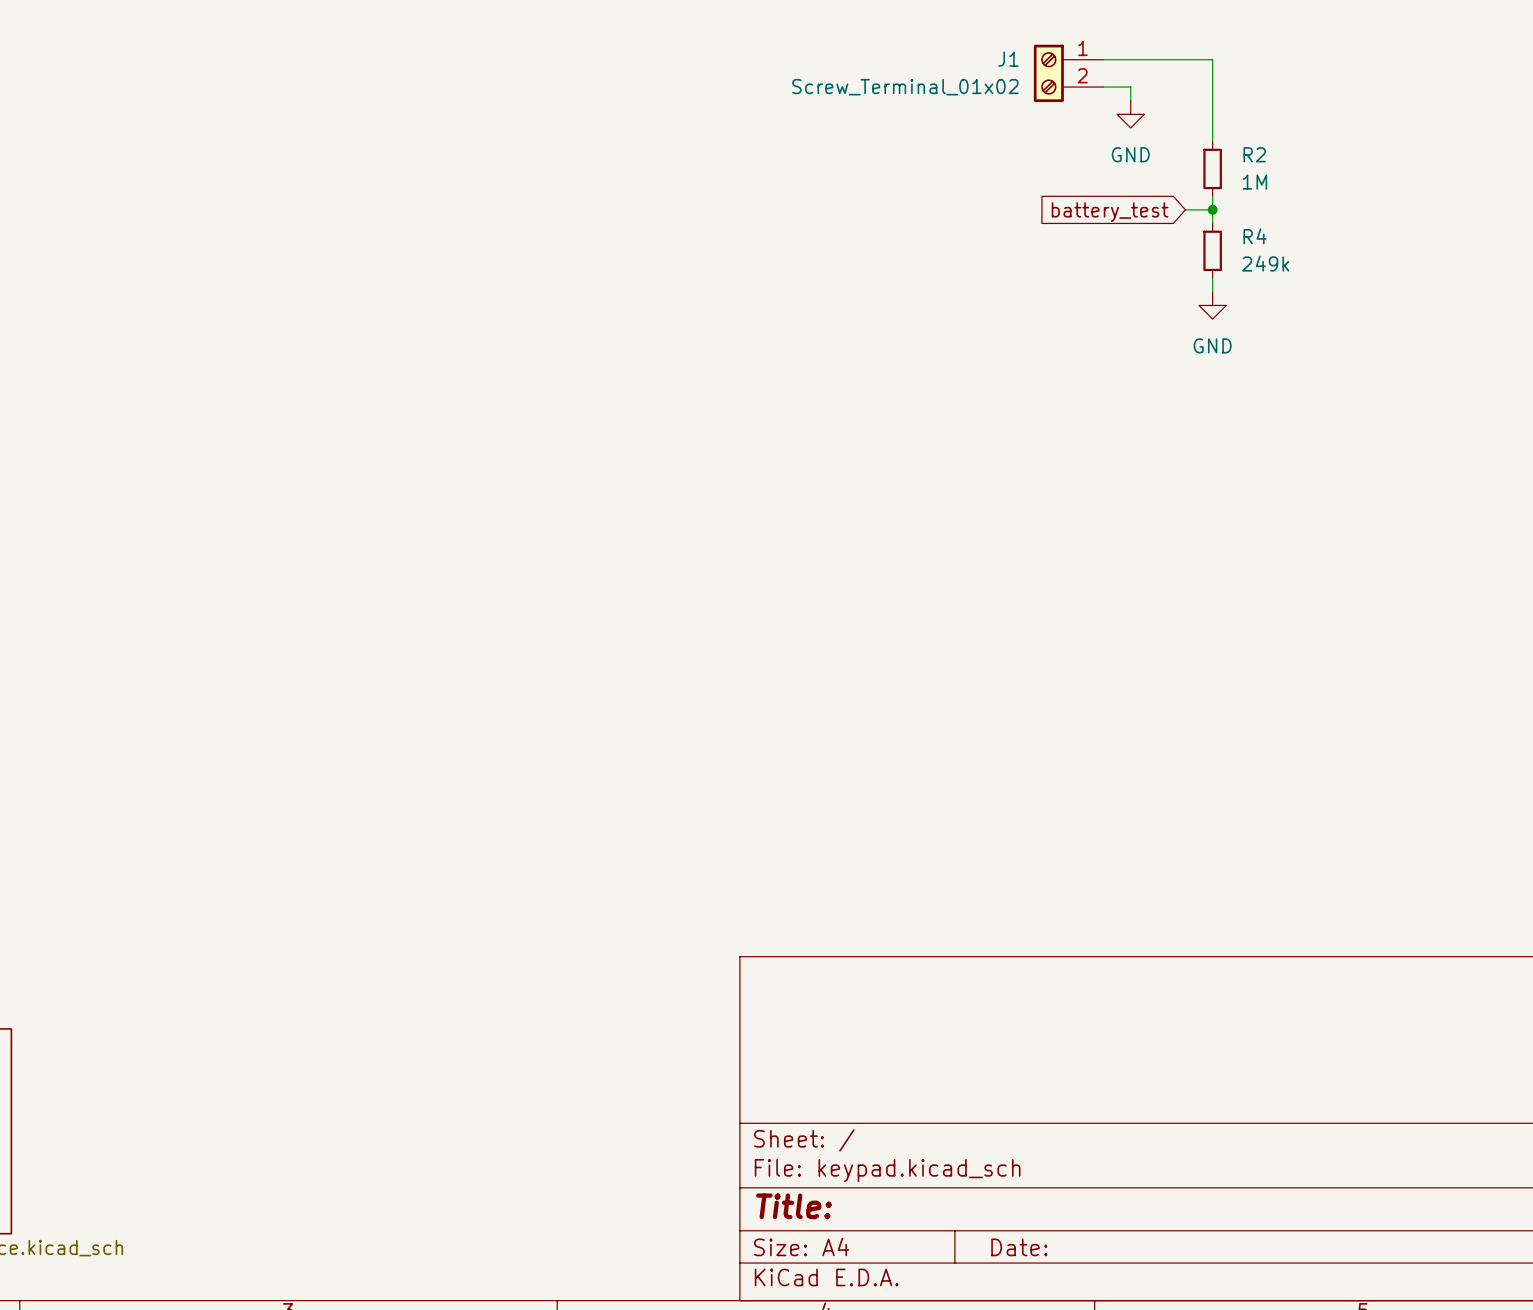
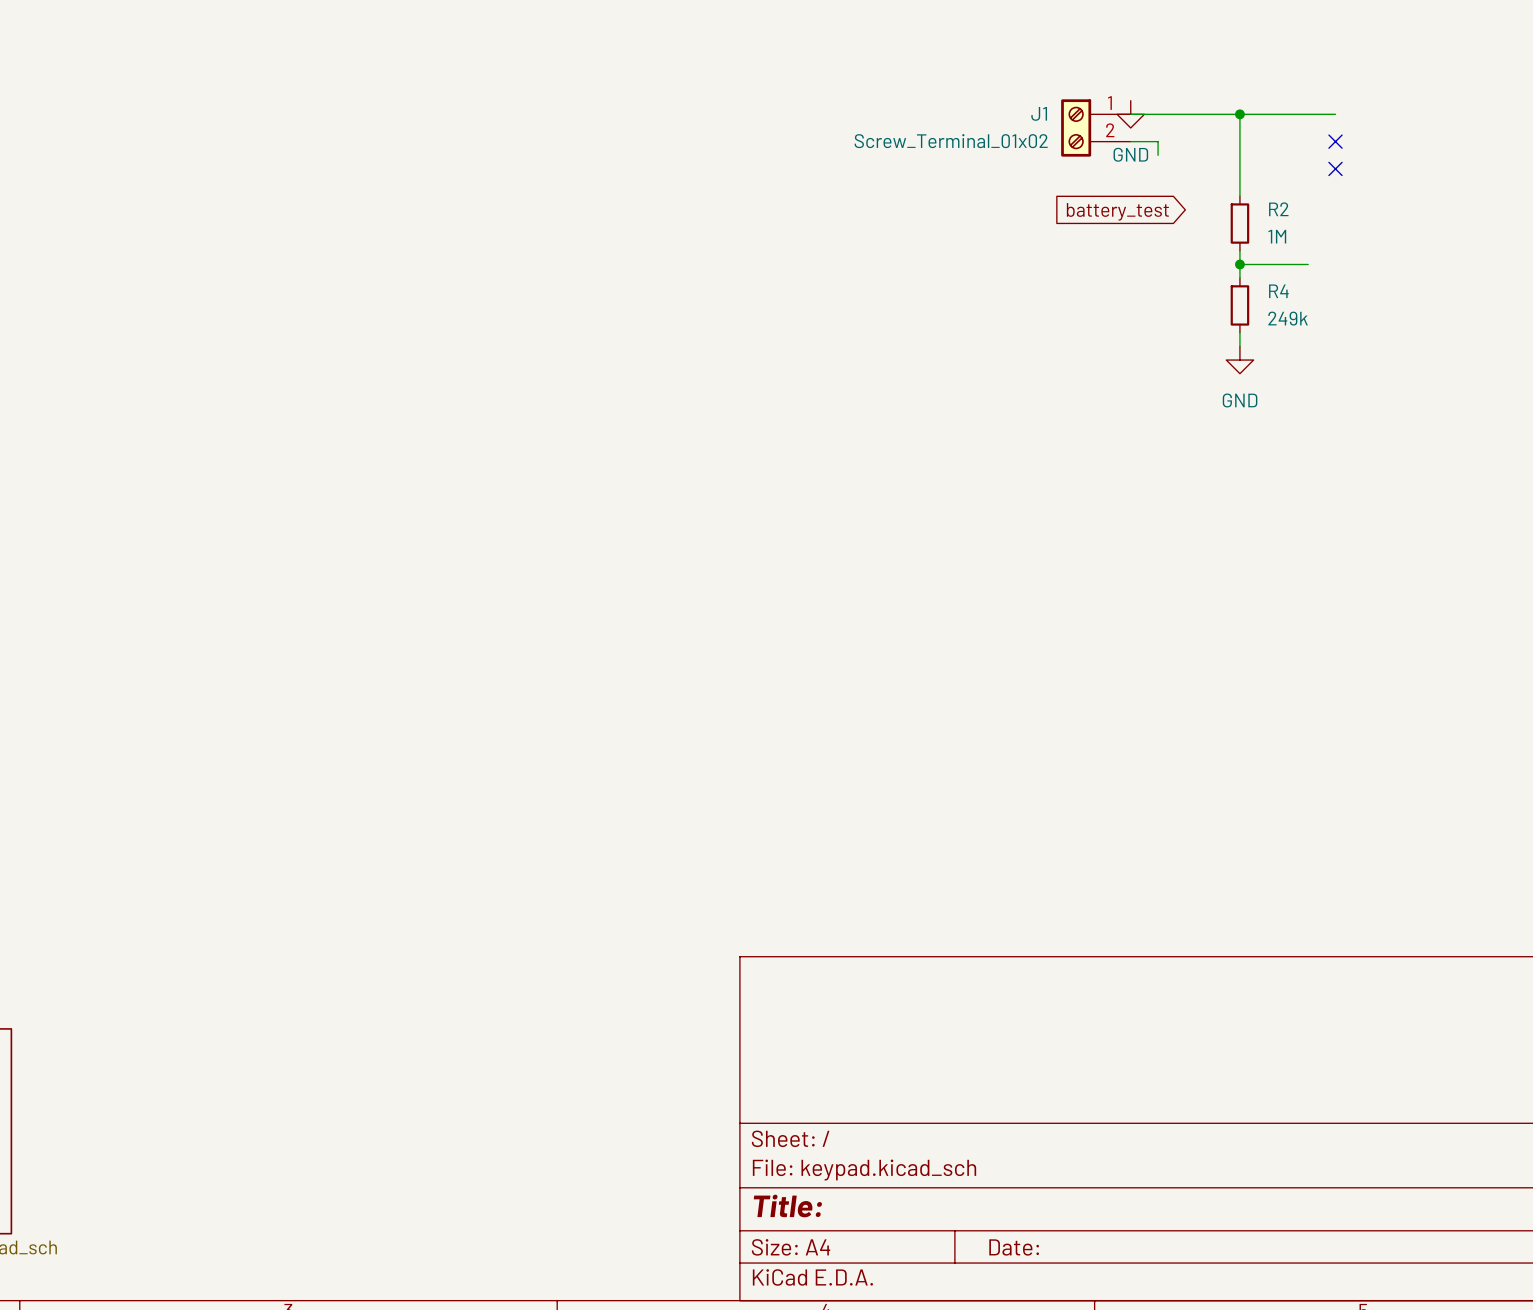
wire: (1103, 59) (1212, 59) (1212, 141) -> none
J1 position: (1068, 73) -> (1095, 127)
wire: (1103, 87) (1130, 87) (1130, 100) -> (1130, 141) (1158, 141) (1158, 155)
wire: none -> (1130, 114) (1335, 114)
wire: none -> (1239, 114) (1239, 196)
junction: none -> (1239, 114)
no-connect mark: none -> (1335, 141)
R2 position: (1212, 168) -> (1239, 223)
no-connect mark: none -> (1335, 168)
wire: (1212, 196) (1212, 223) -> (1239, 250) (1239, 278)
wire: (1185, 209) (1212, 209) -> none
junction: (1212, 209) -> none
R4 position: (1212, 250) -> (1239, 305)
wire: none -> (1239, 264) (1308, 264)
junction: none -> (1239, 264)
wire: (1212, 278) (1212, 291) -> (1239, 332) (1239, 346)
power symbol position: GND (1212, 305) -> GND (1239, 360)

